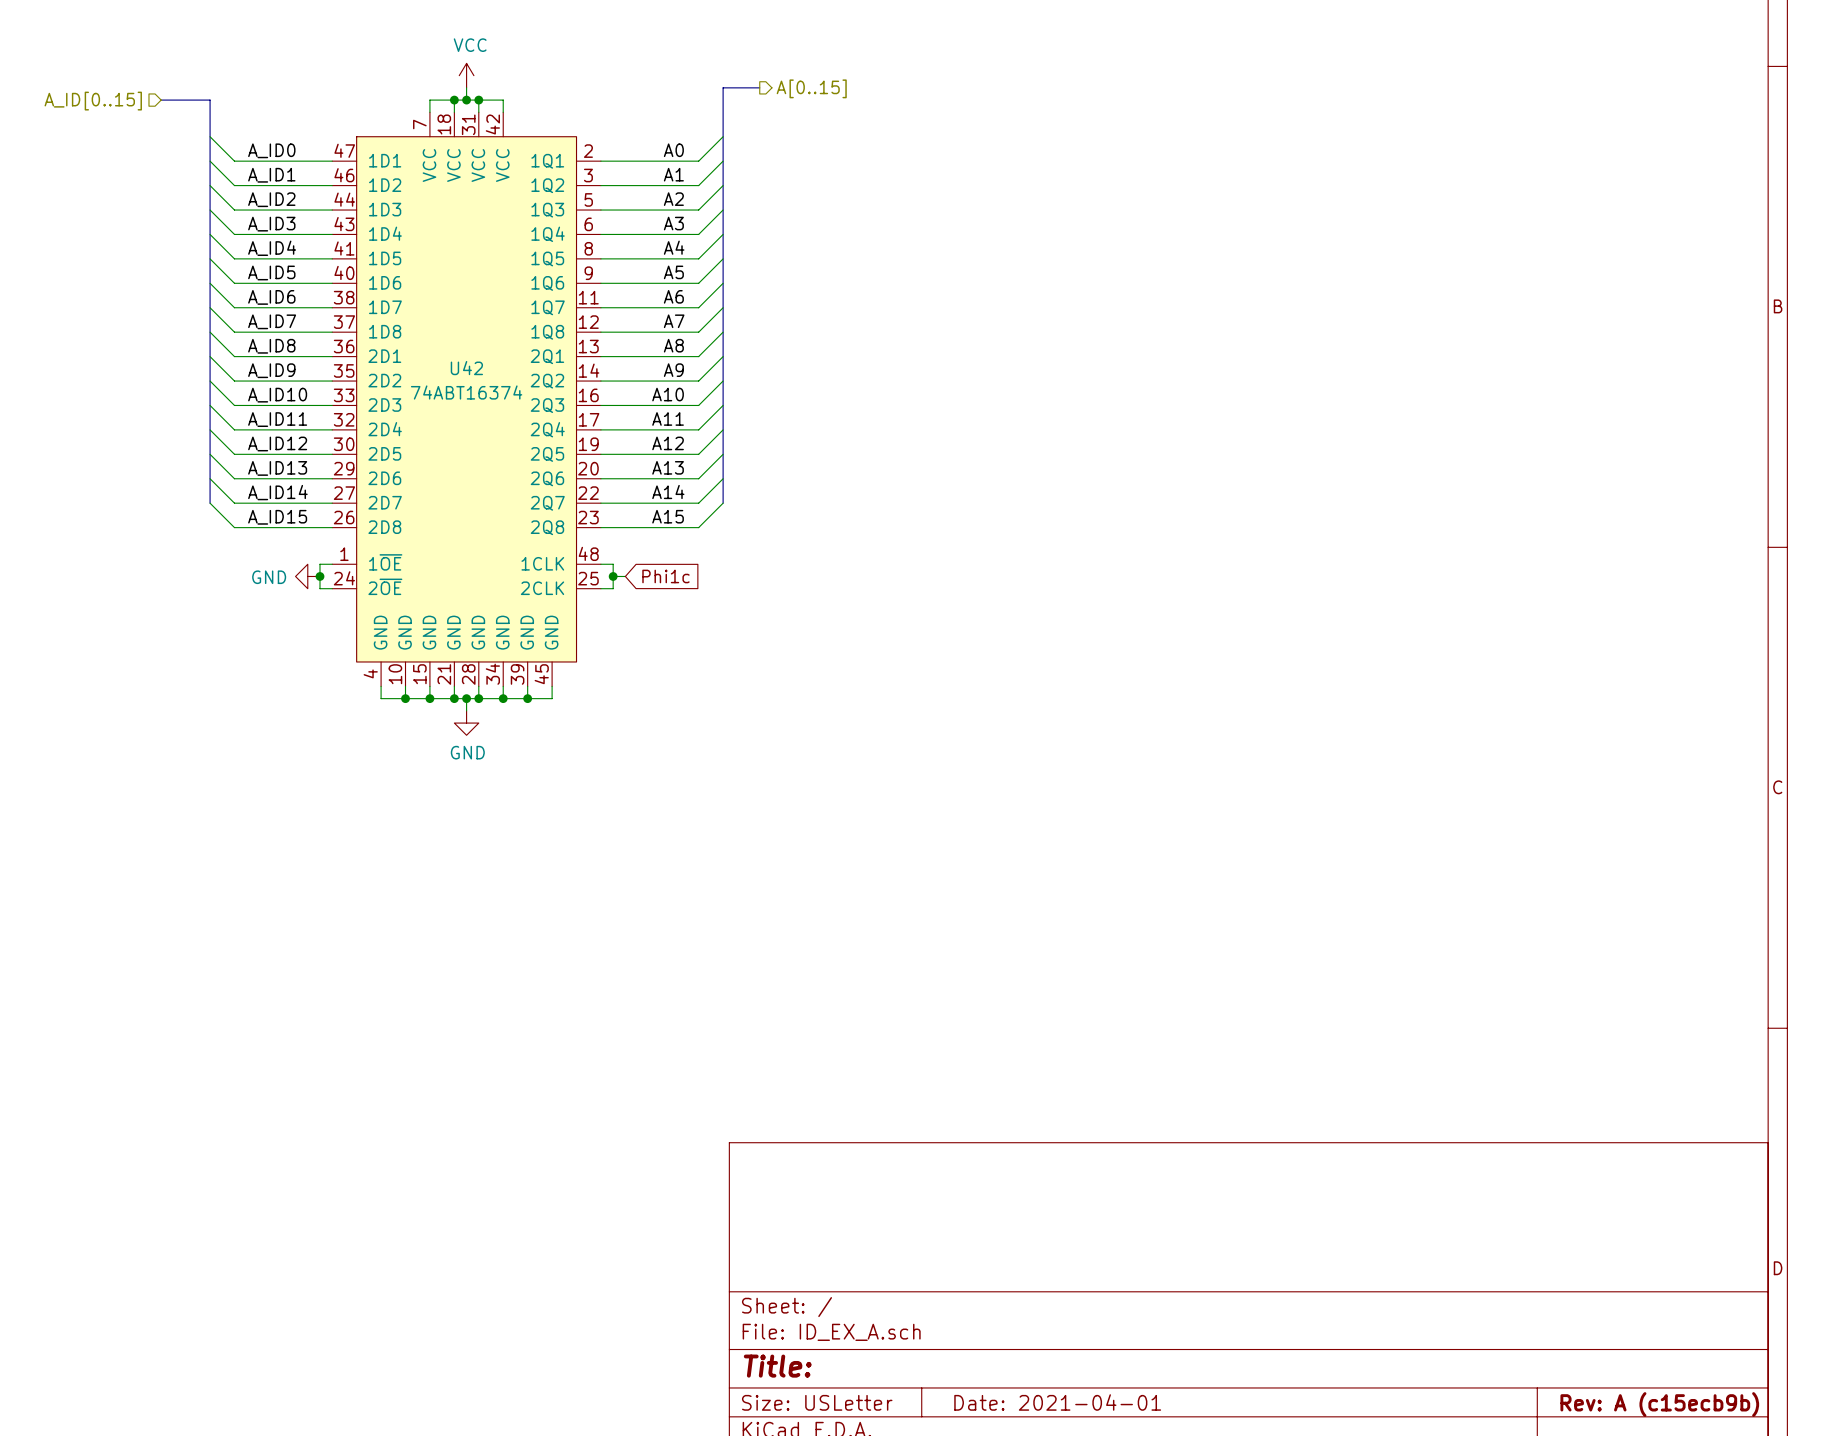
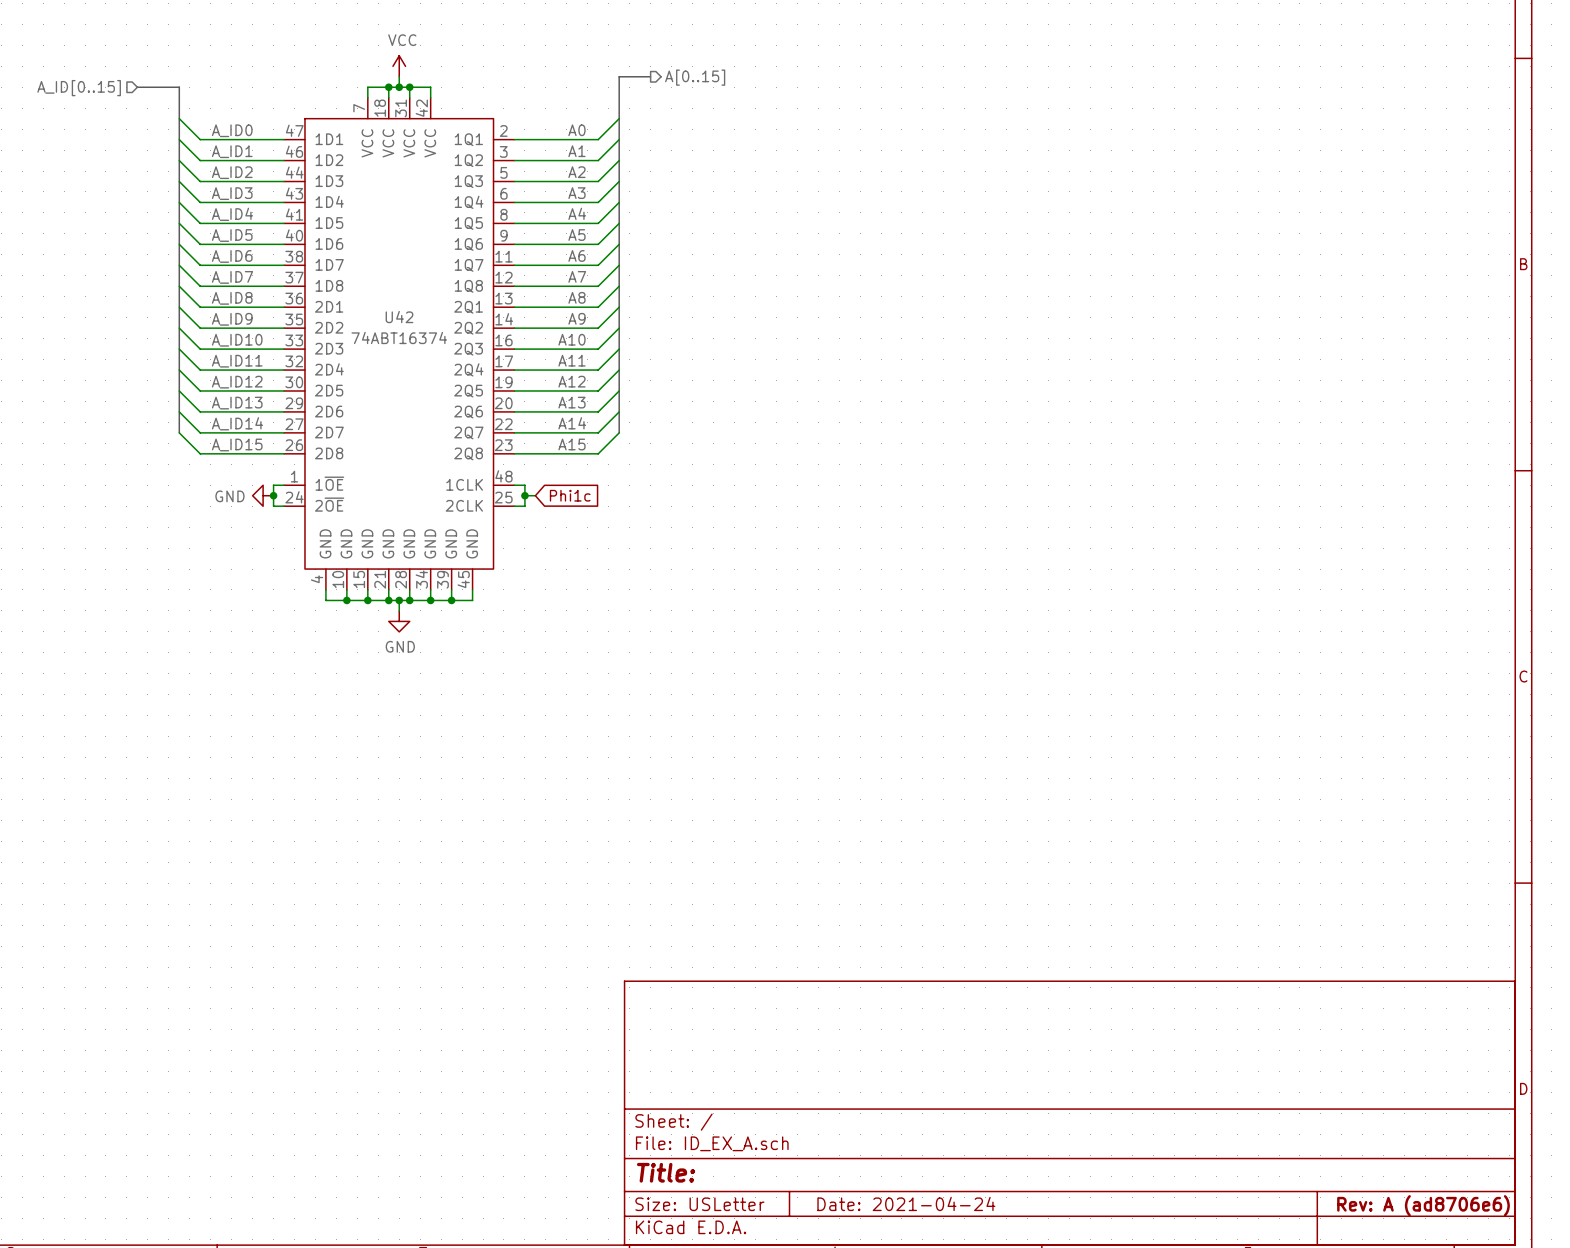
title block: Date: 2021-04-01 (1057, 1402) -> Date: 2021-04-24 (906, 1203)
title block: Rev: A (c15ecb9b) (1659, 1404) -> Rev: A (ad8706e6) (1423, 1205)

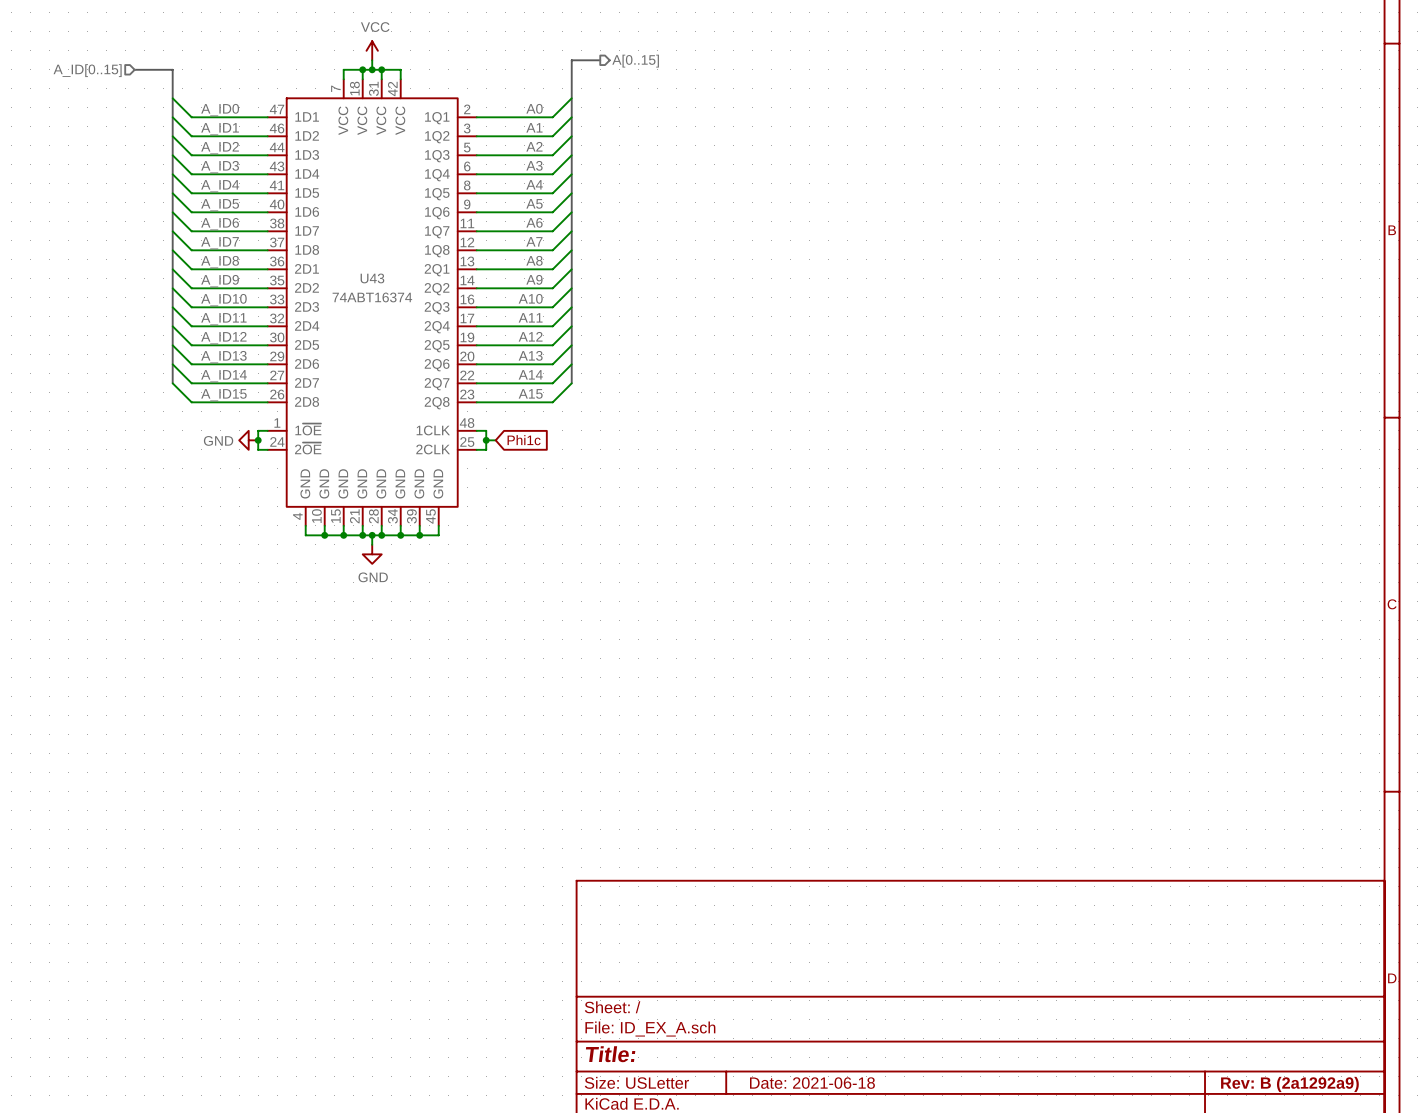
U42 name: U42 (399, 317) -> U43 (372, 278)
title block: Date: 2021-04-24 (906, 1203) -> Date: 2021-06-18 (812, 1083)
title block: Rev: A (ad8706e6) (1423, 1205) -> Rev: B (2a1292a9) (1289, 1084)

